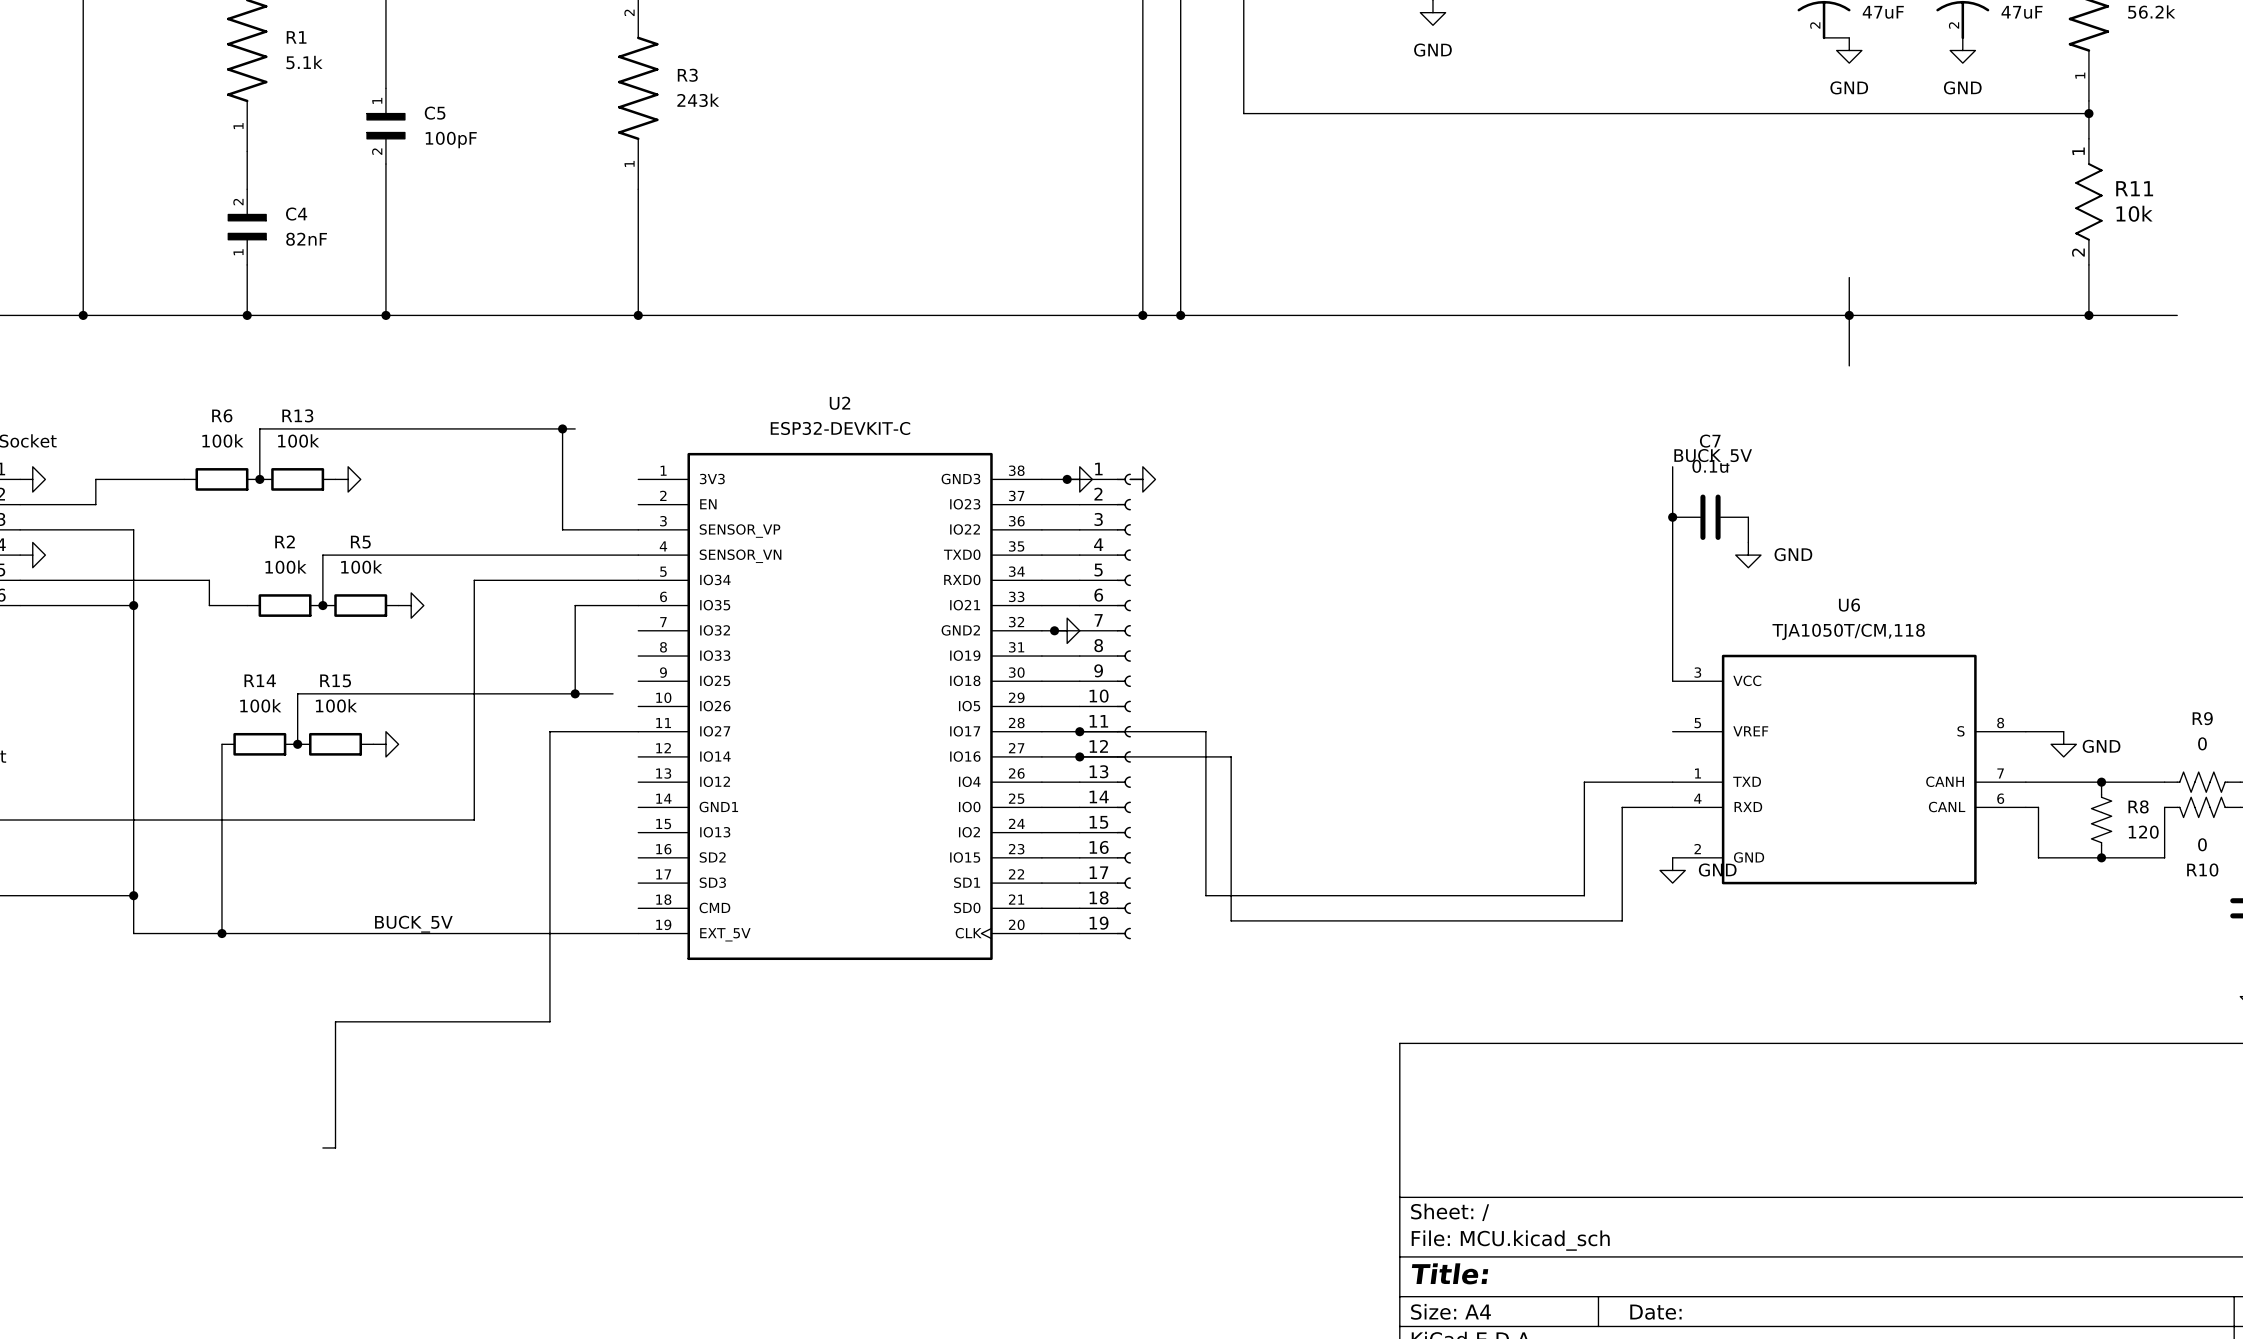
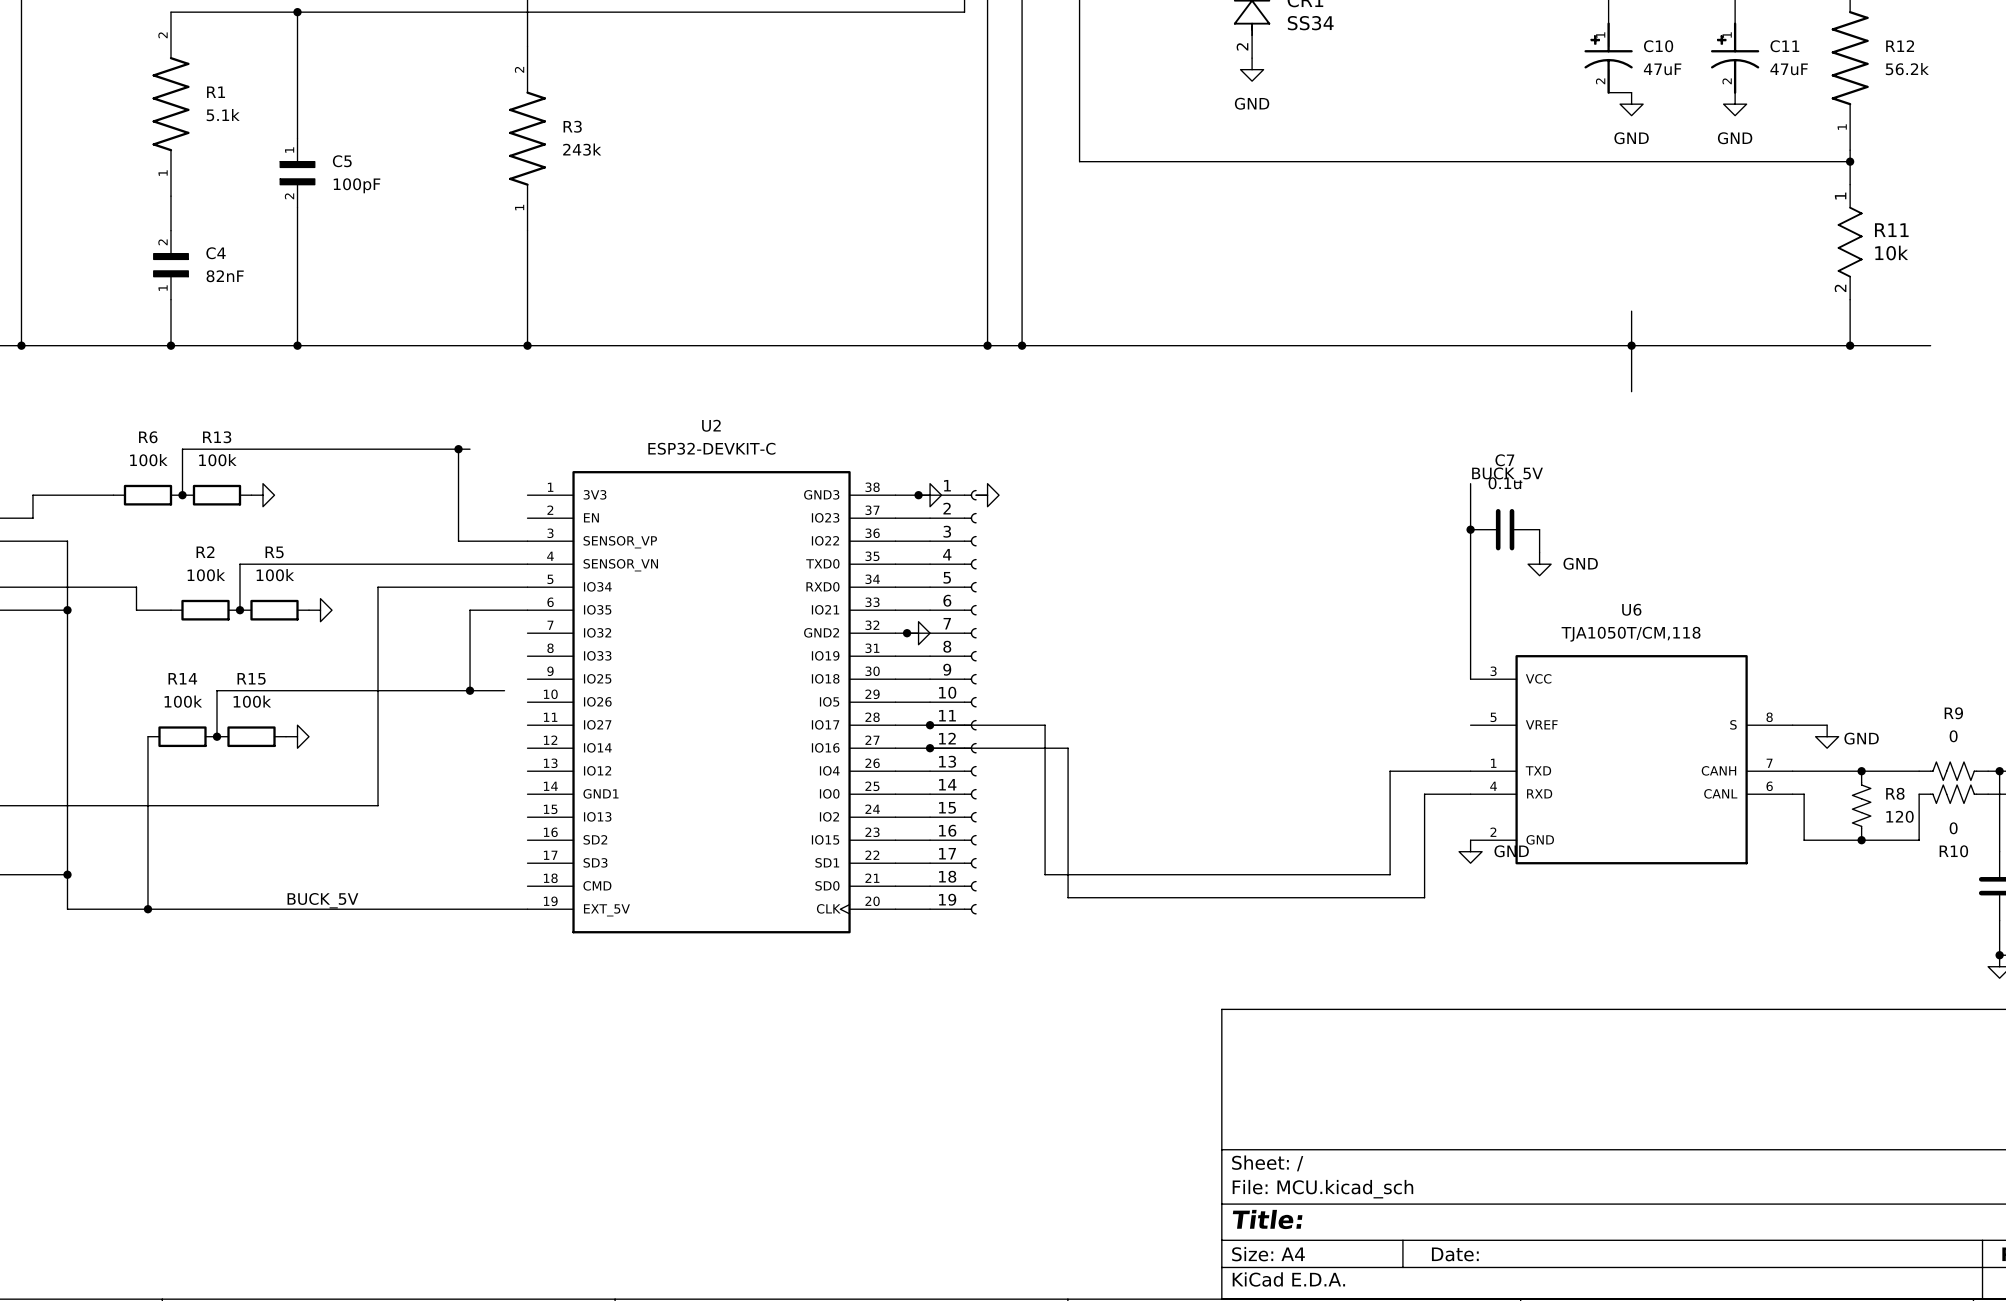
wire: (638, 731) (549, 731) (549, 1021) (335, 1021) (335, 1147) (322, 1147) -> none

